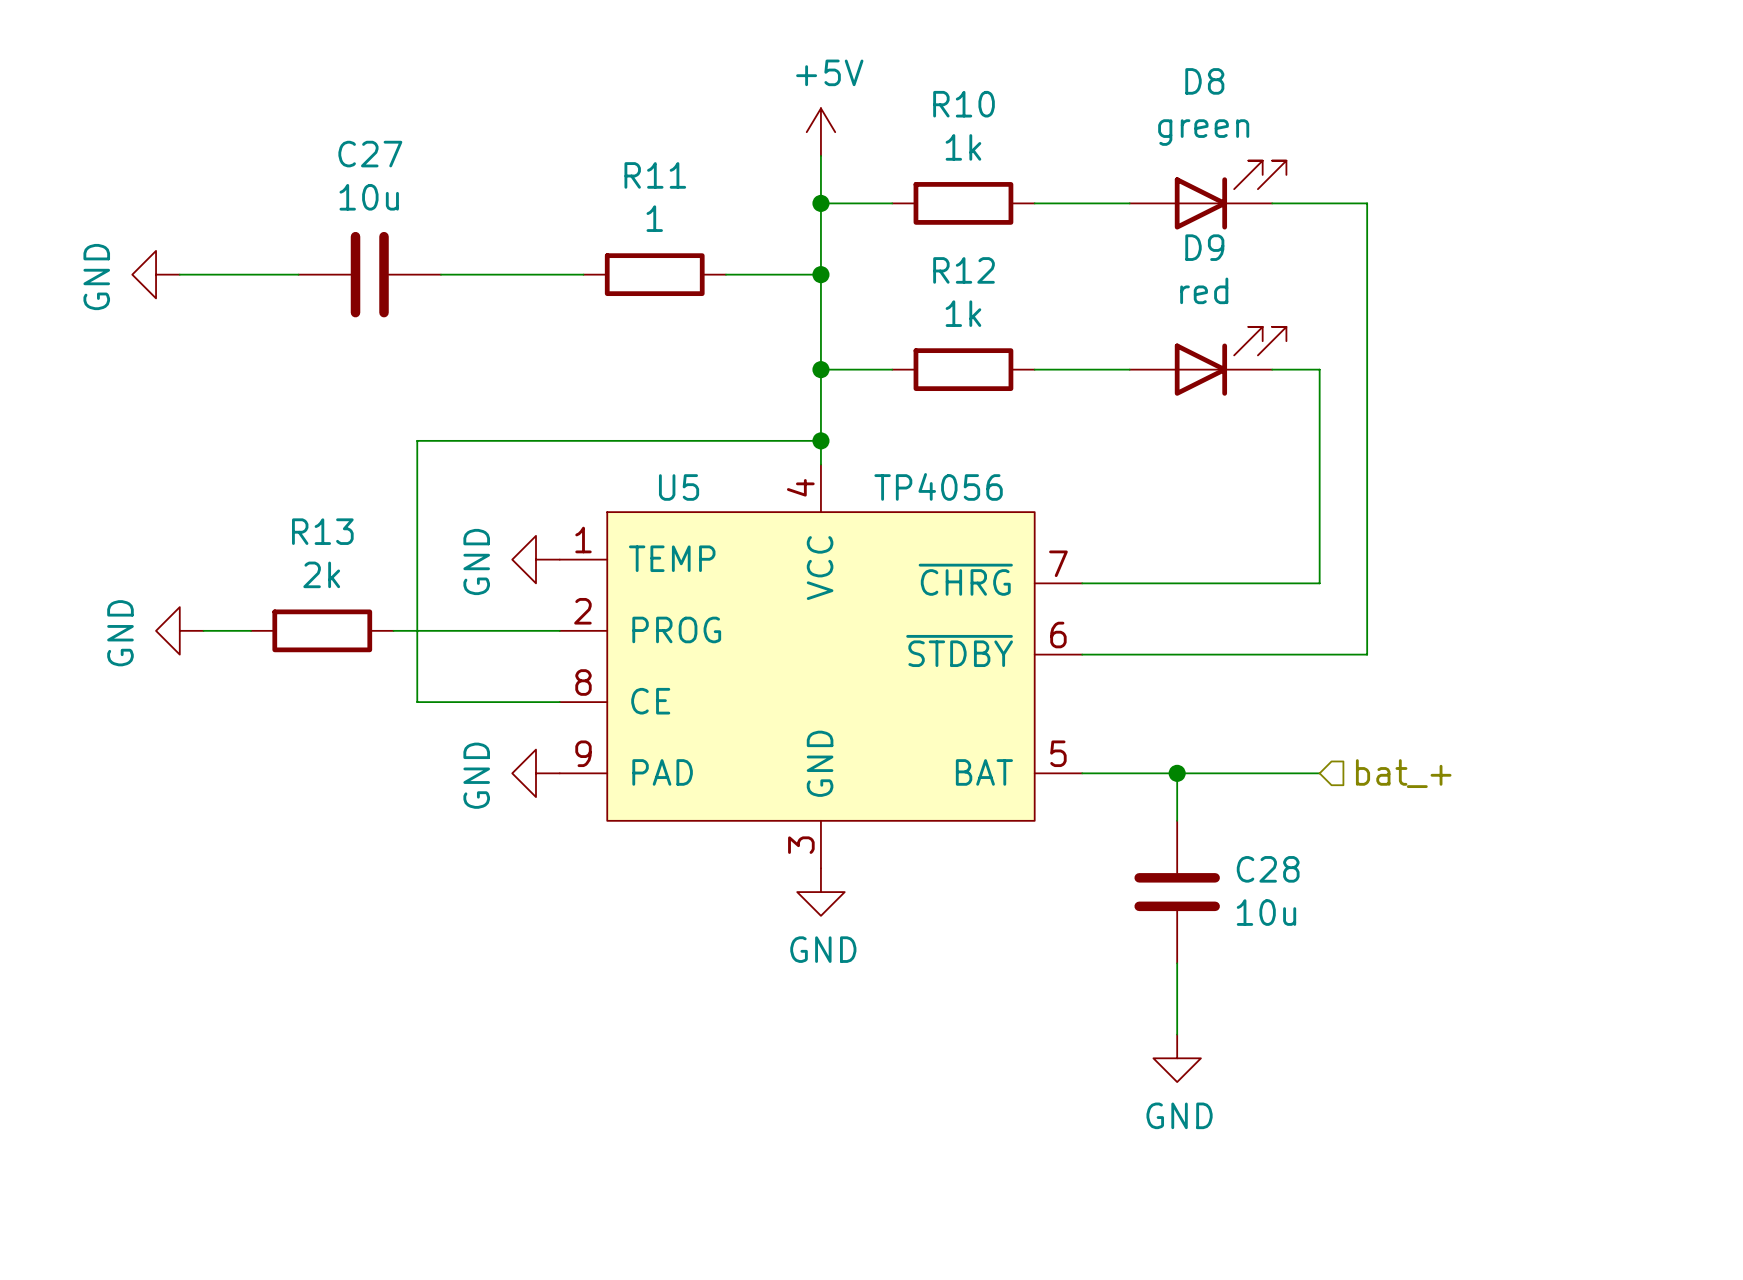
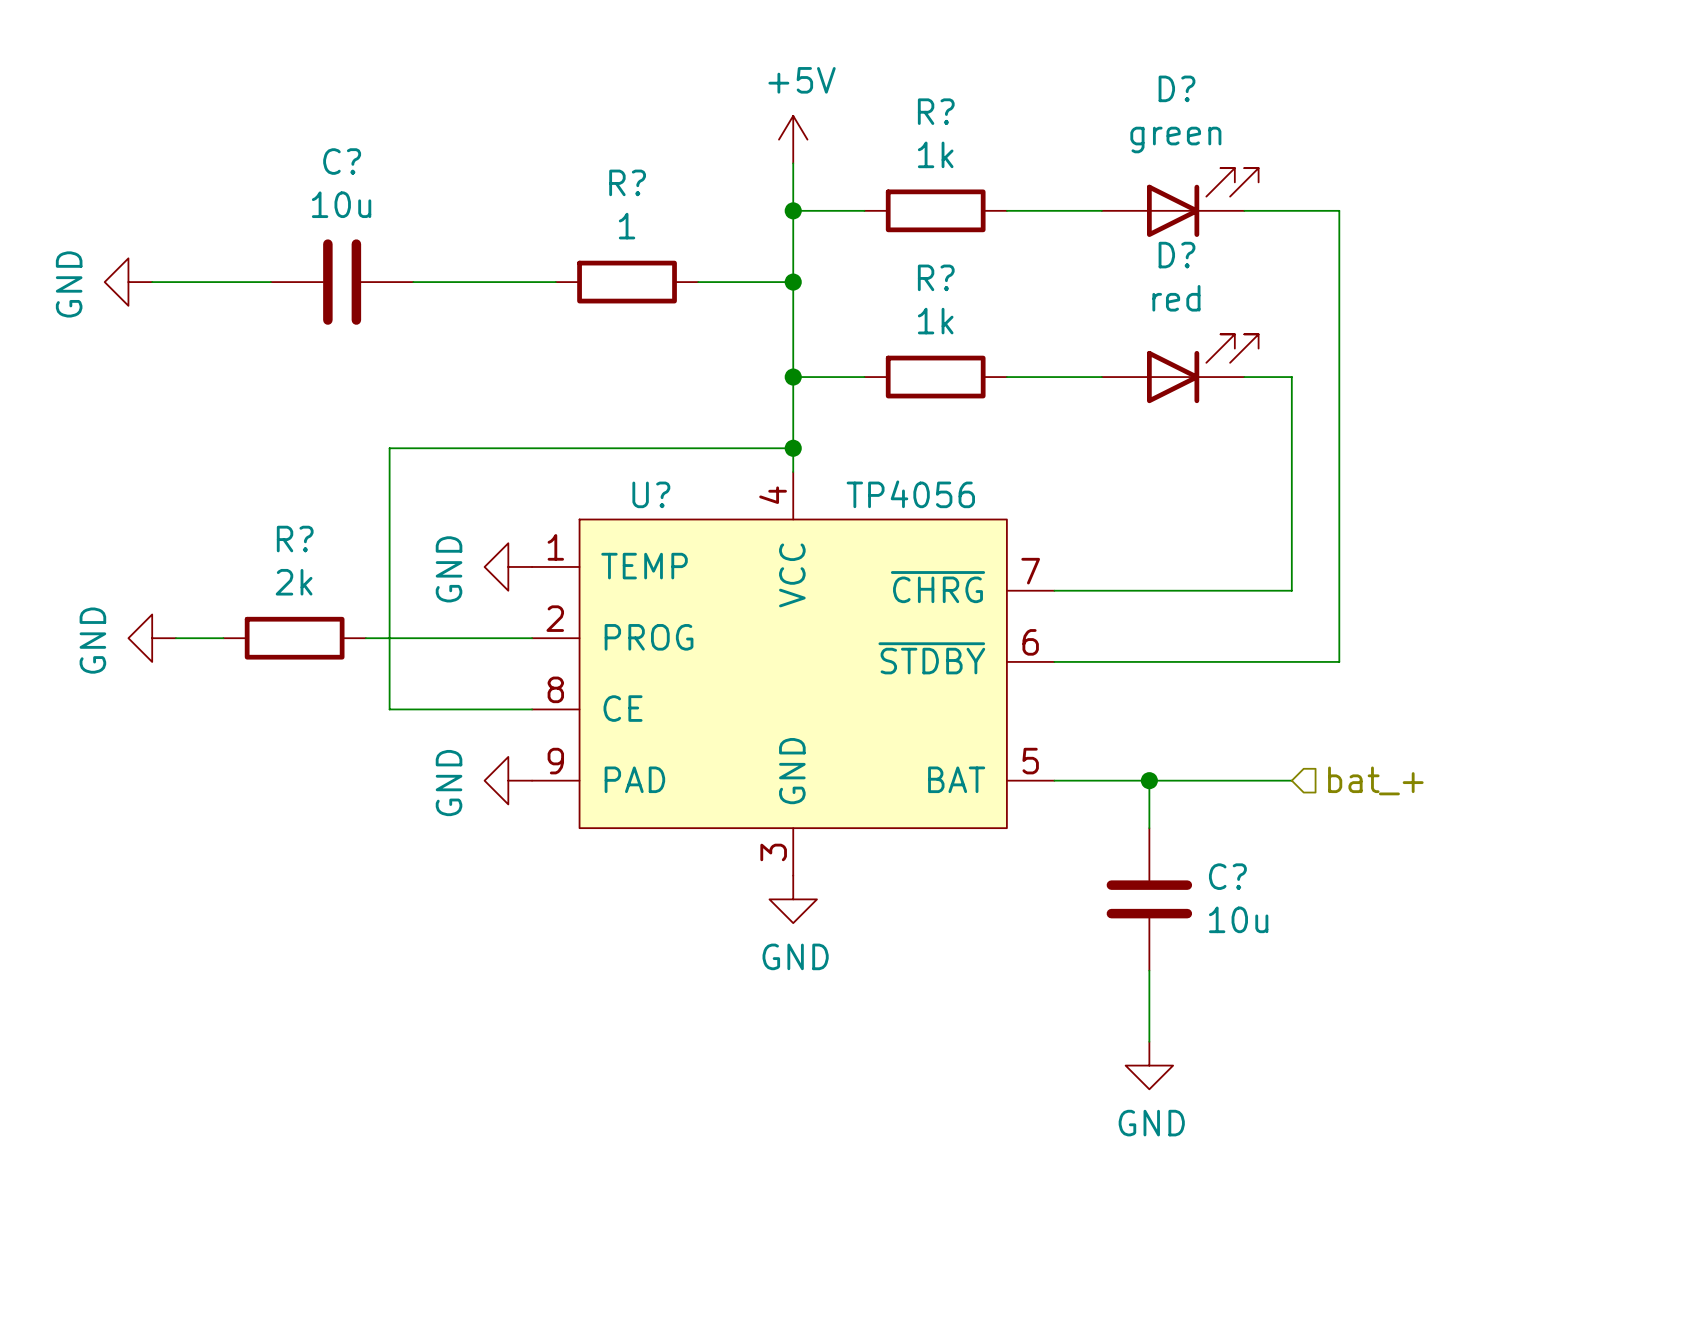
D8 name: D8 (1204, 81) -> D? (1177, 88)
R10 name: R10 (964, 104) -> R? (936, 111)
C27 name: C27 (370, 154) -> C? (342, 161)
R11 name: R11 (655, 175) -> R? (627, 182)
D9 name: D9 (1204, 247) -> D? (1177, 255)
R12 name: R12 (964, 270) -> R? (936, 277)
U5 name: U5 (679, 487) -> U? (651, 494)
R13 name: R13 (322, 531) -> R? (295, 539)
C28 name: C28 (1268, 869) -> C? (1227, 876)

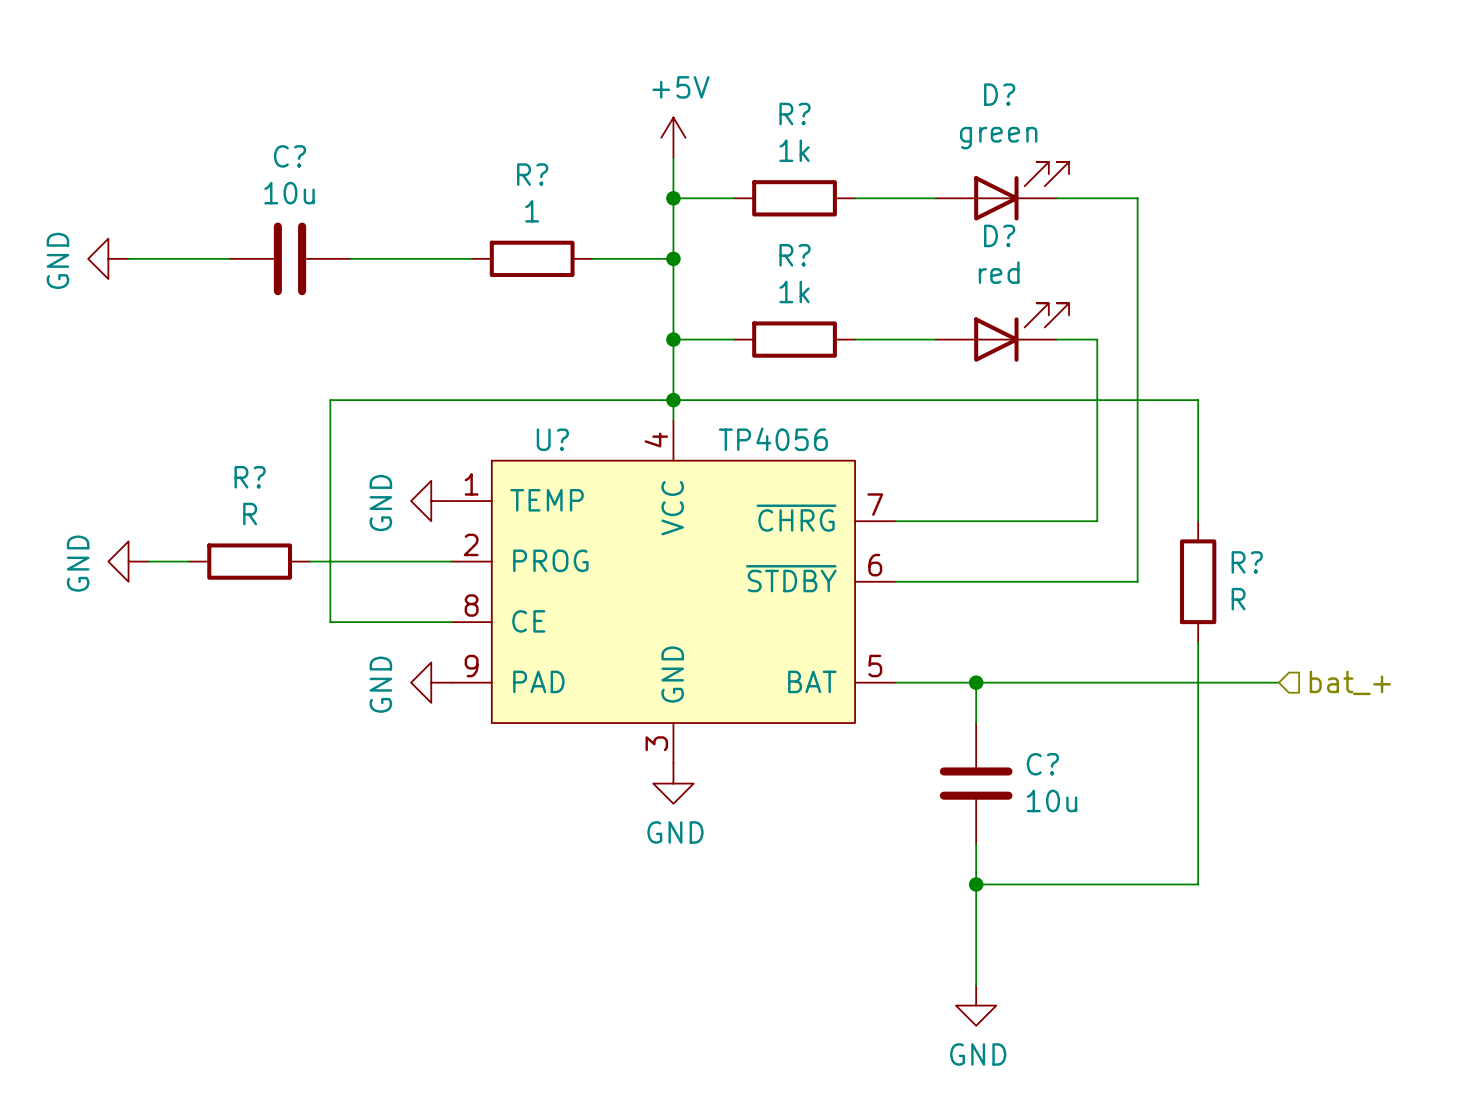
wire: none -> (673, 400) (1198, 400) (1198, 521)
R? value: 2k (294, 582) -> R (250, 514)
R?: none -> R (1198, 581)
wire: none -> (1198, 642) (1198, 884) (976, 884)
wire: none -> (1097, 682) (1278, 682)
hierarchical label position: bat_+ (1375, 780) -> bat_+ (1350, 682)
junction: none -> (976, 884)
wire: none -> (976, 904) (976, 985)
power symbol position: GND (1149, 1065) -> GND (976, 1005)

